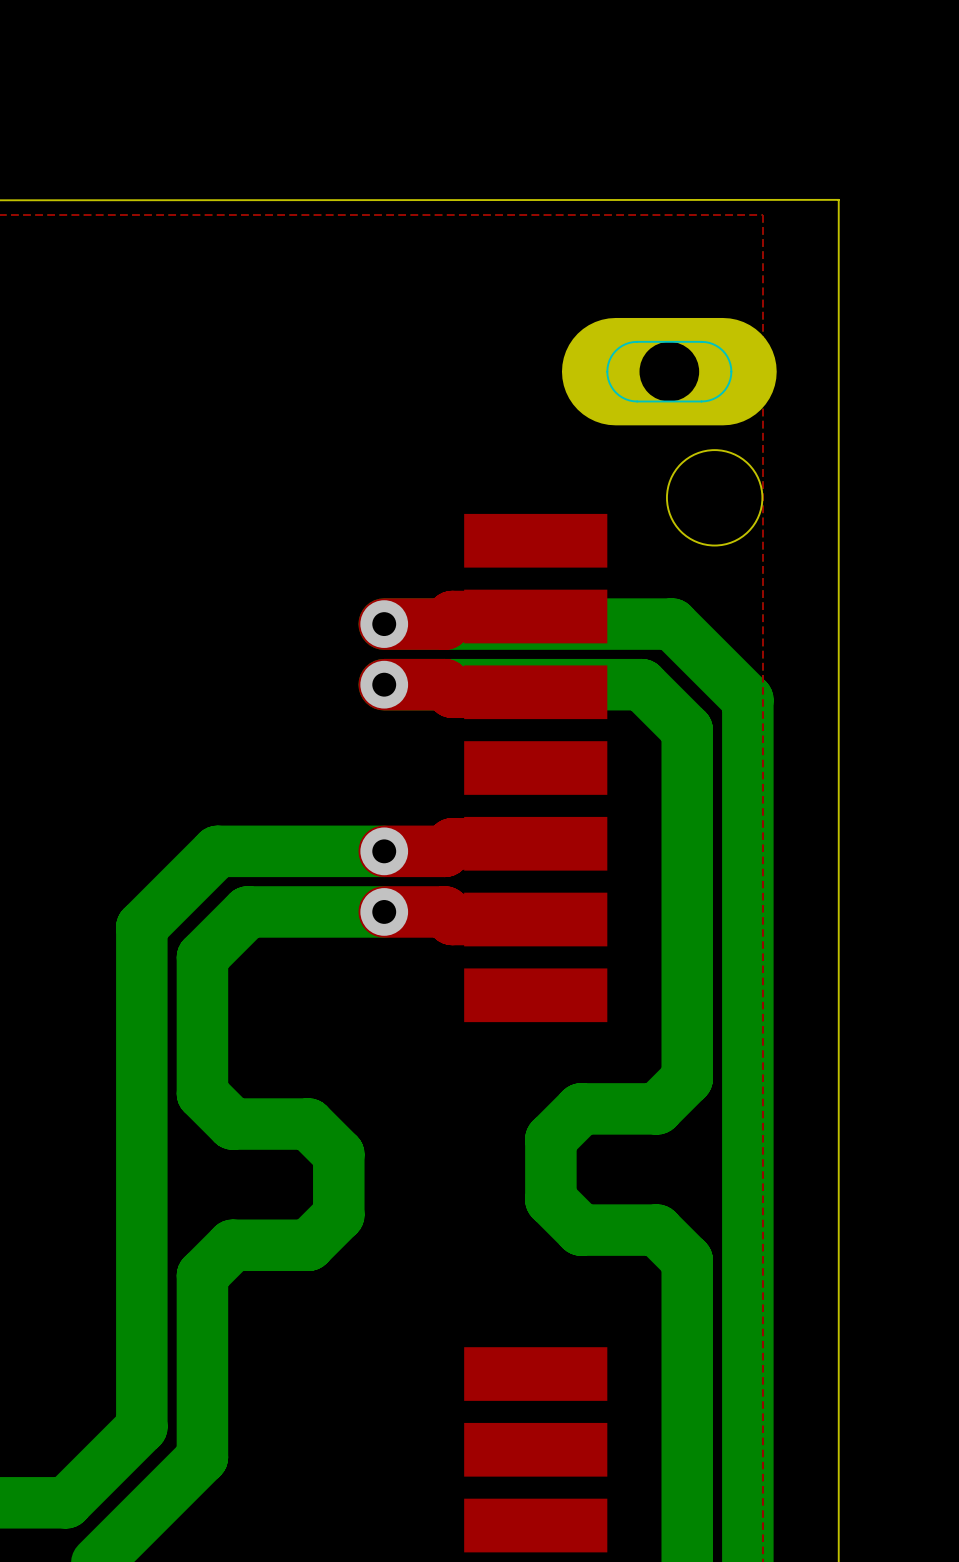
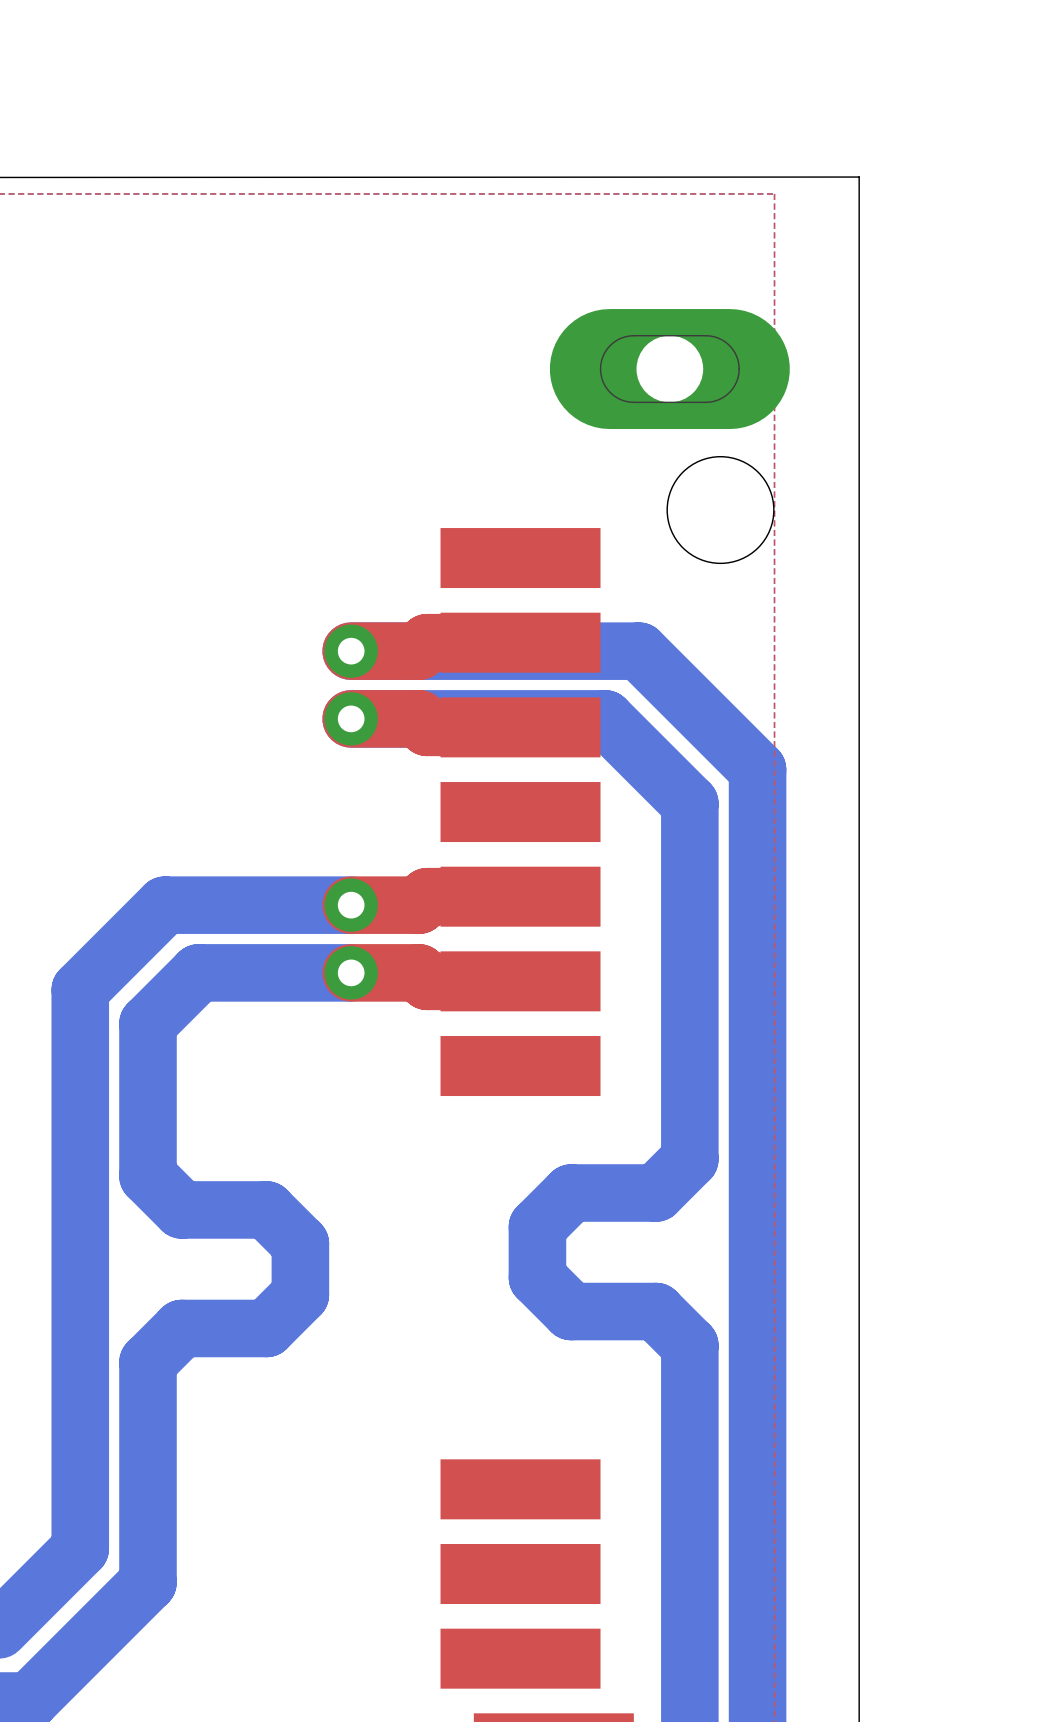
bottom track: (641, 624) (672, 624) (747, 699) (747, 730) -> (639, 651) (757, 769)
bottom track: (611, 684) (641, 684) (687, 730) (687, 760) -> (605, 718) (689, 803)
bottom track: (550, 1184) (550, 1199) (581, 1230) (656, 1230) (687, 1260) -> (537, 1277) (571, 1311) (655, 1311) (689, 1345) (689, 1362)
bottom track: (338, 1199) (338, 1214) (308, 1245) (232, 1245) (202, 1275) -> (300, 1294) (266, 1328) (181, 1328) (147, 1362) (147, 1379)

